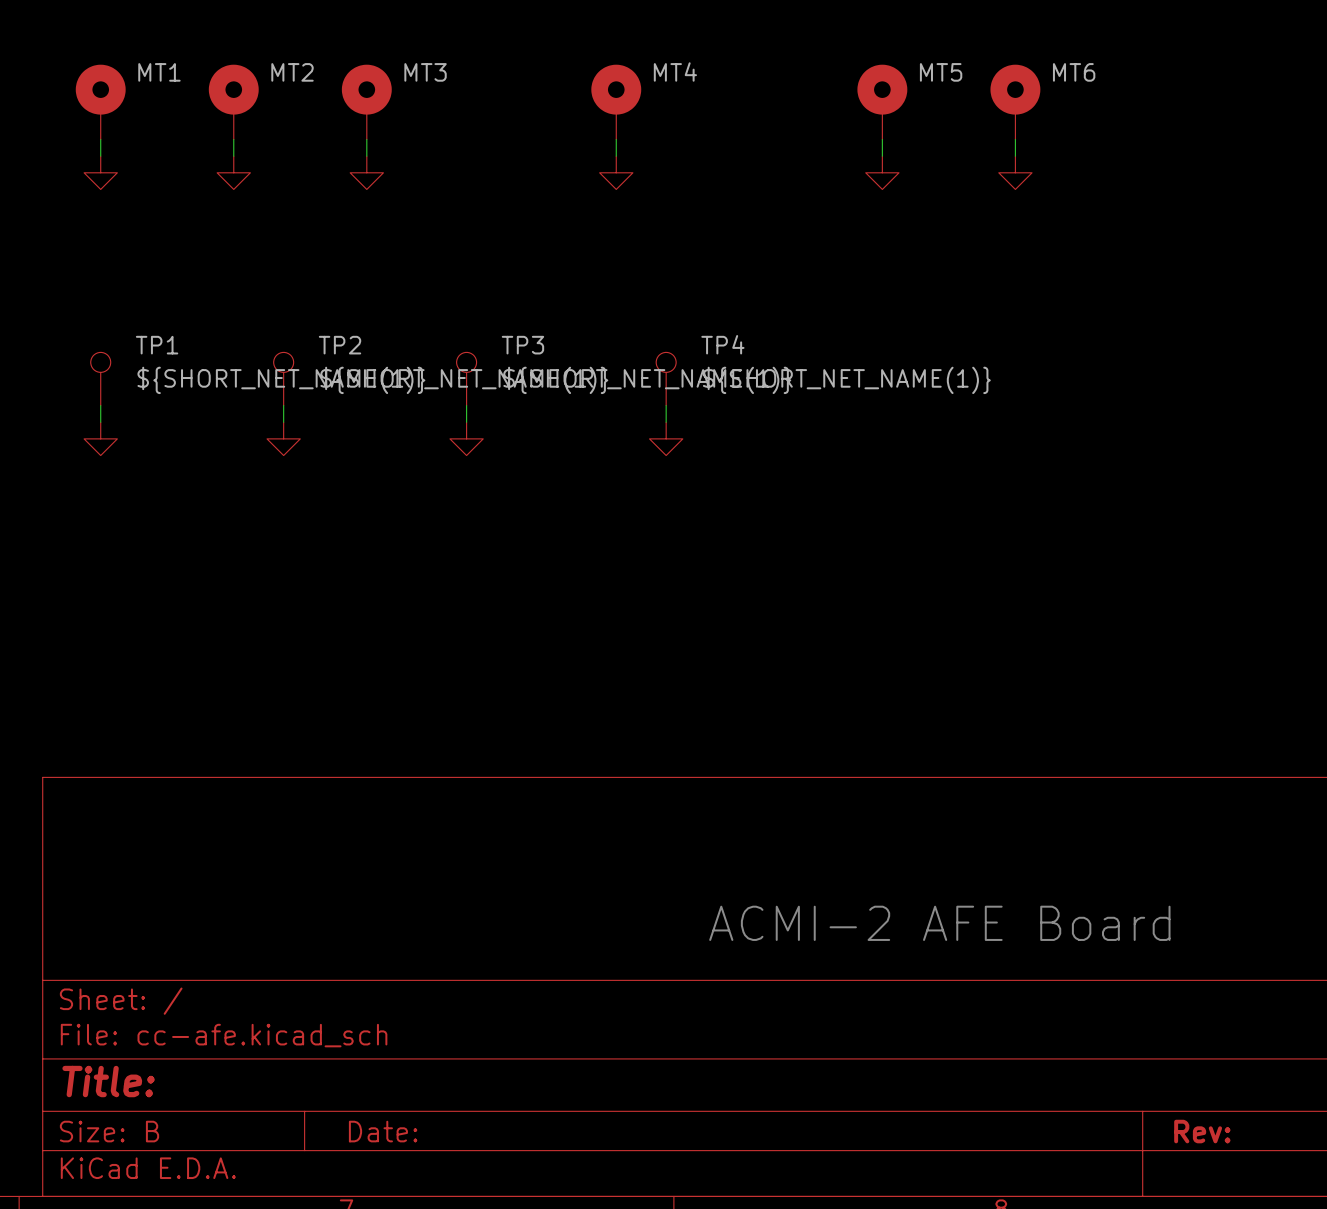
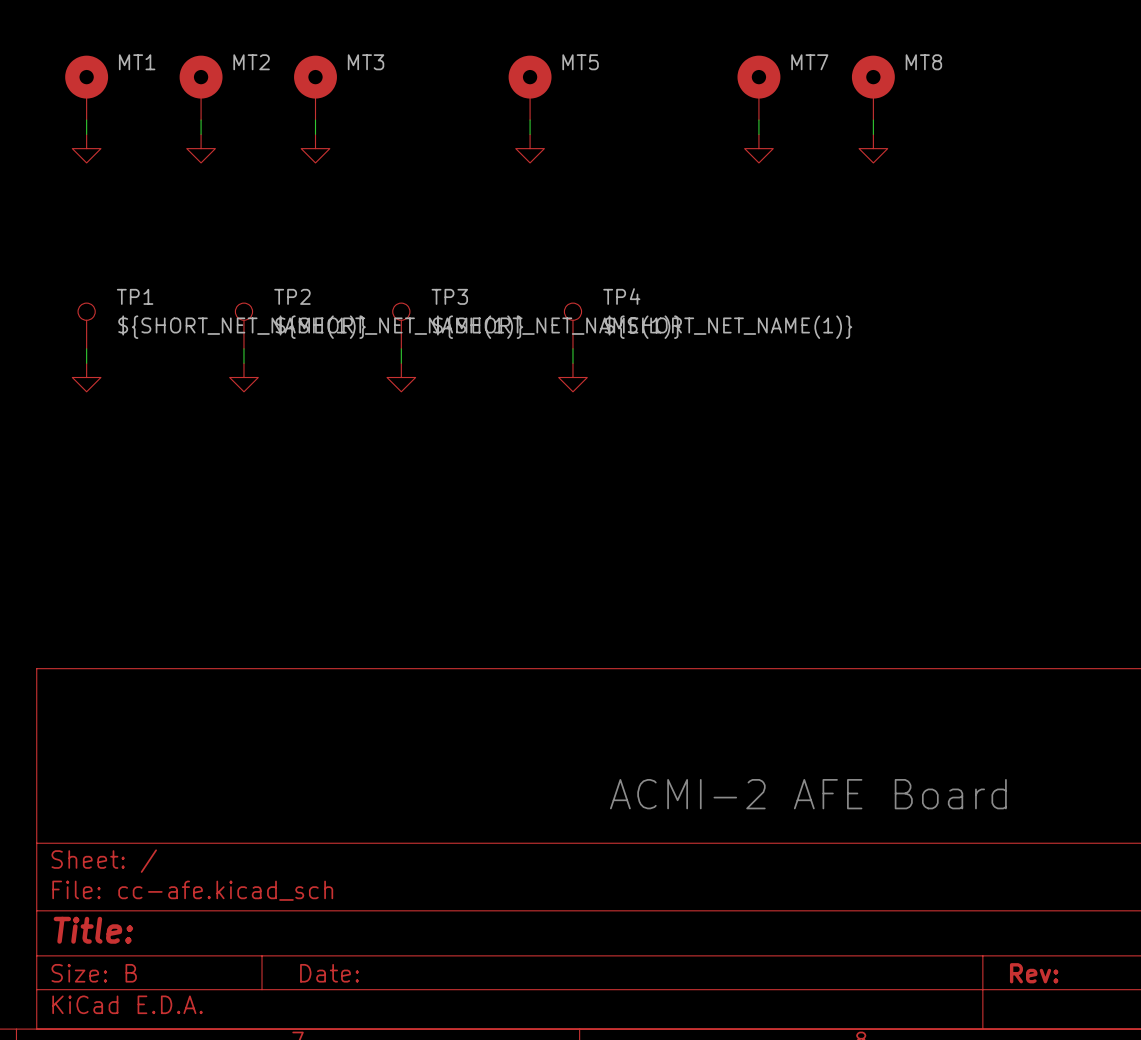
MT4 name: MT4 (675, 72) -> MT5 (580, 62)
MT5 name: MT5 (941, 72) -> MT7 (809, 62)
MT6 name: MT6 (1074, 72) -> MT8 (923, 62)

